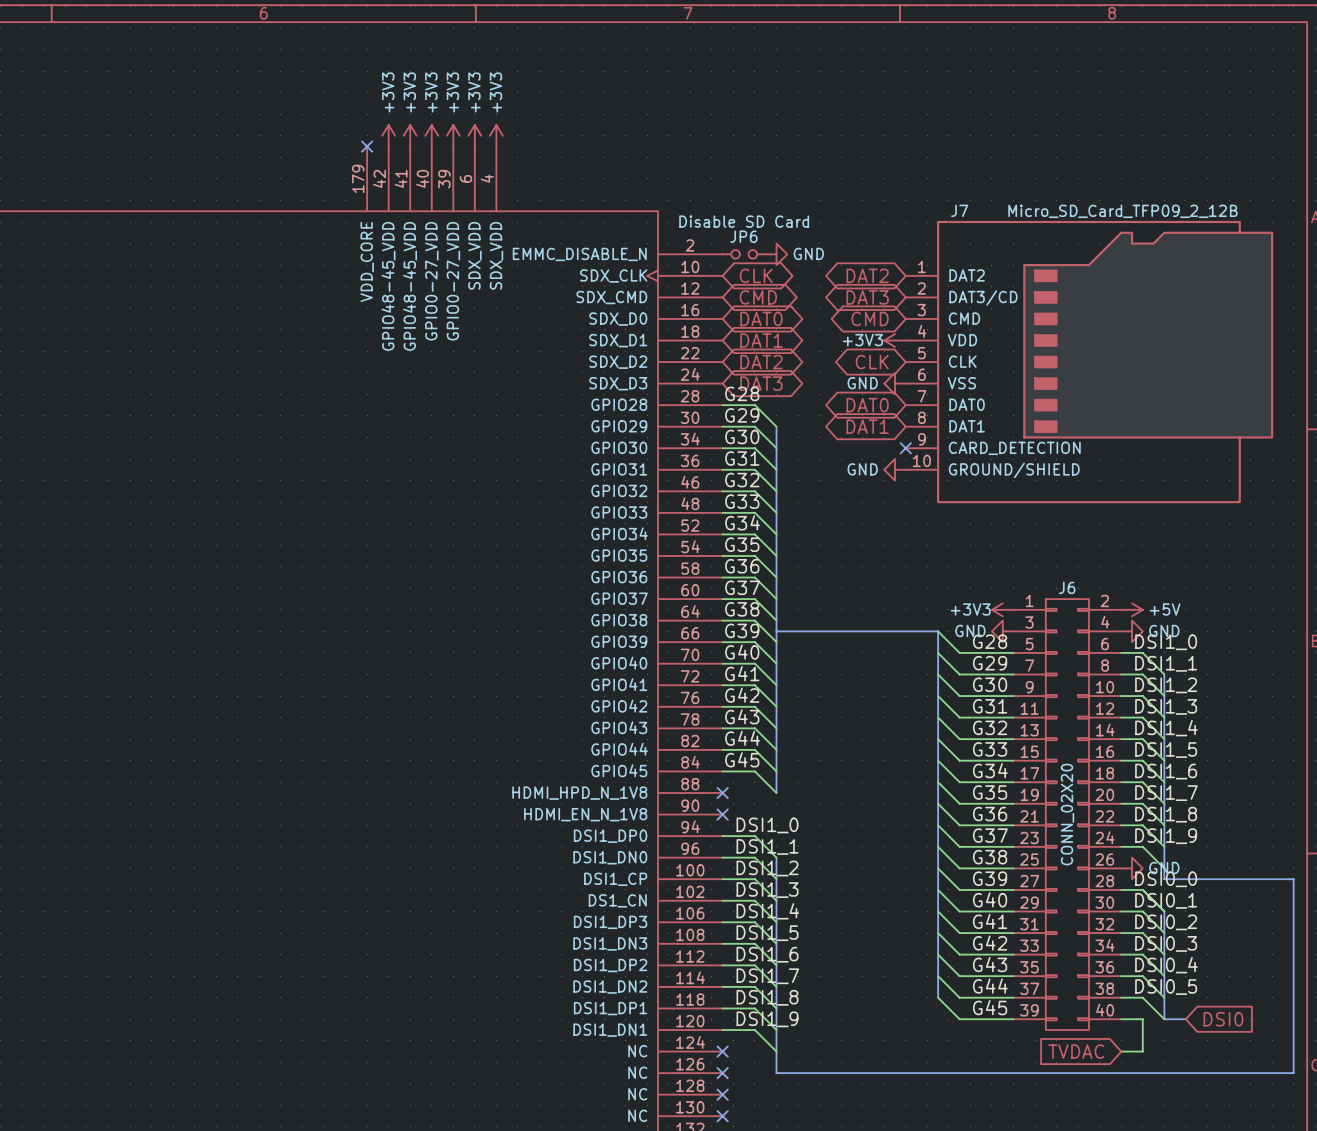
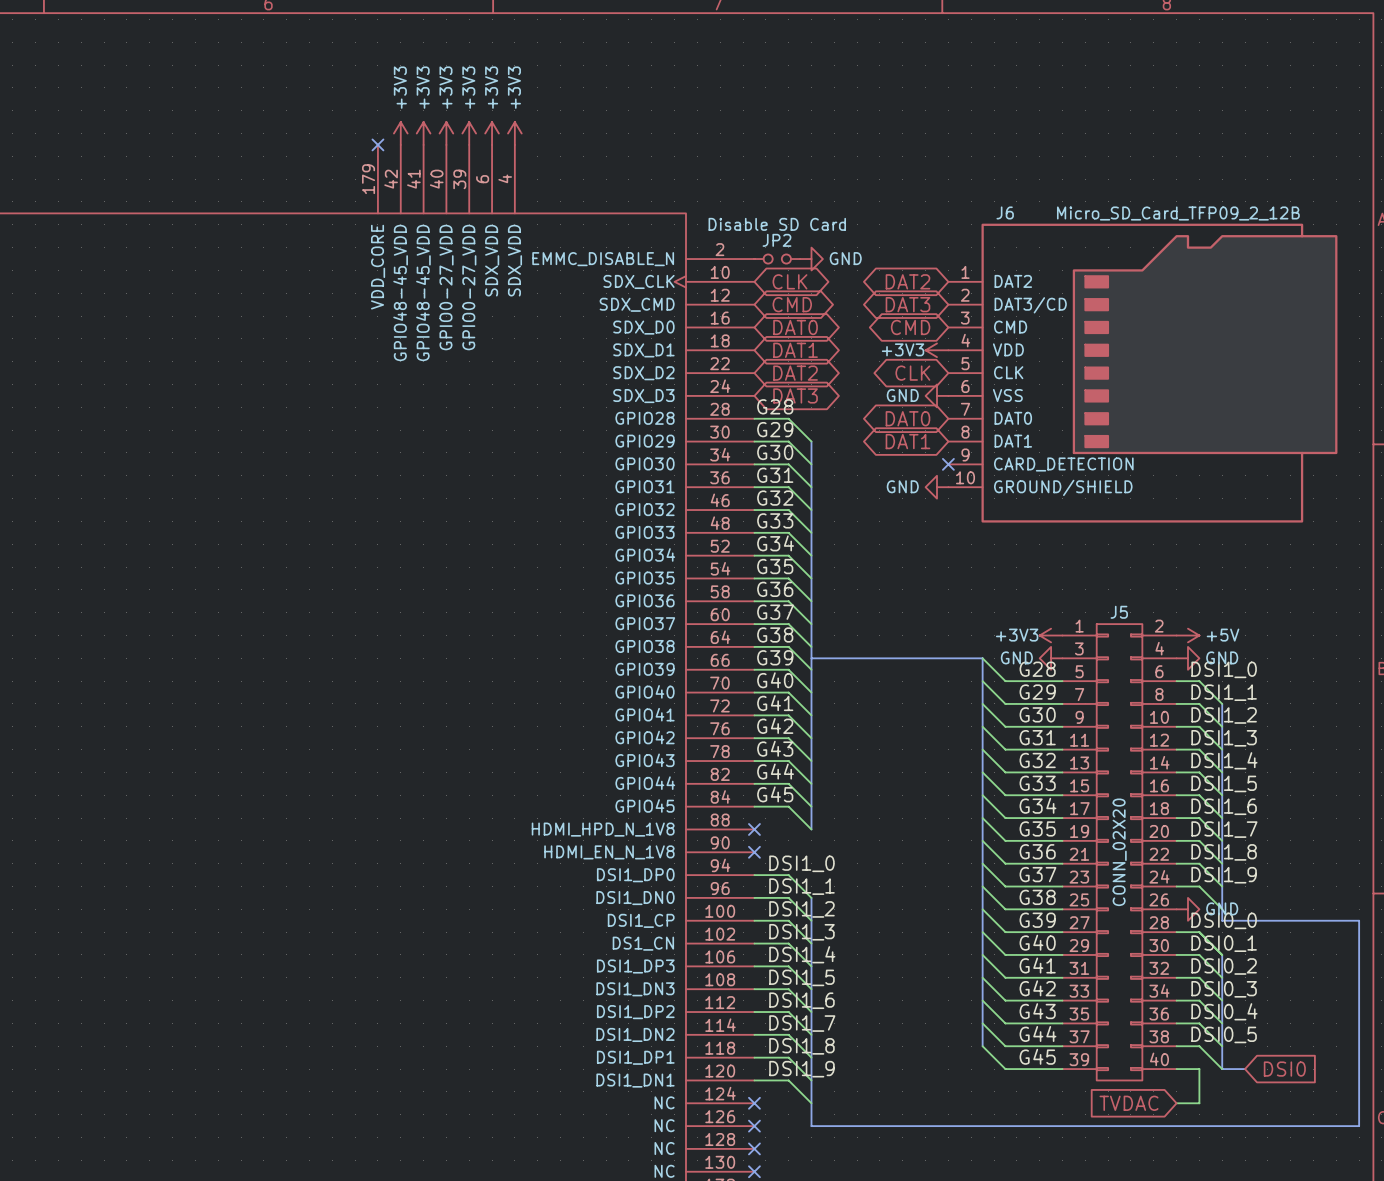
J7 name: J7 (959, 210) -> J6 (1005, 212)
JP6 name: JP6 (743, 236) -> JP2 (776, 240)
J6 name: J6 (1067, 587) -> J5 (1119, 612)

